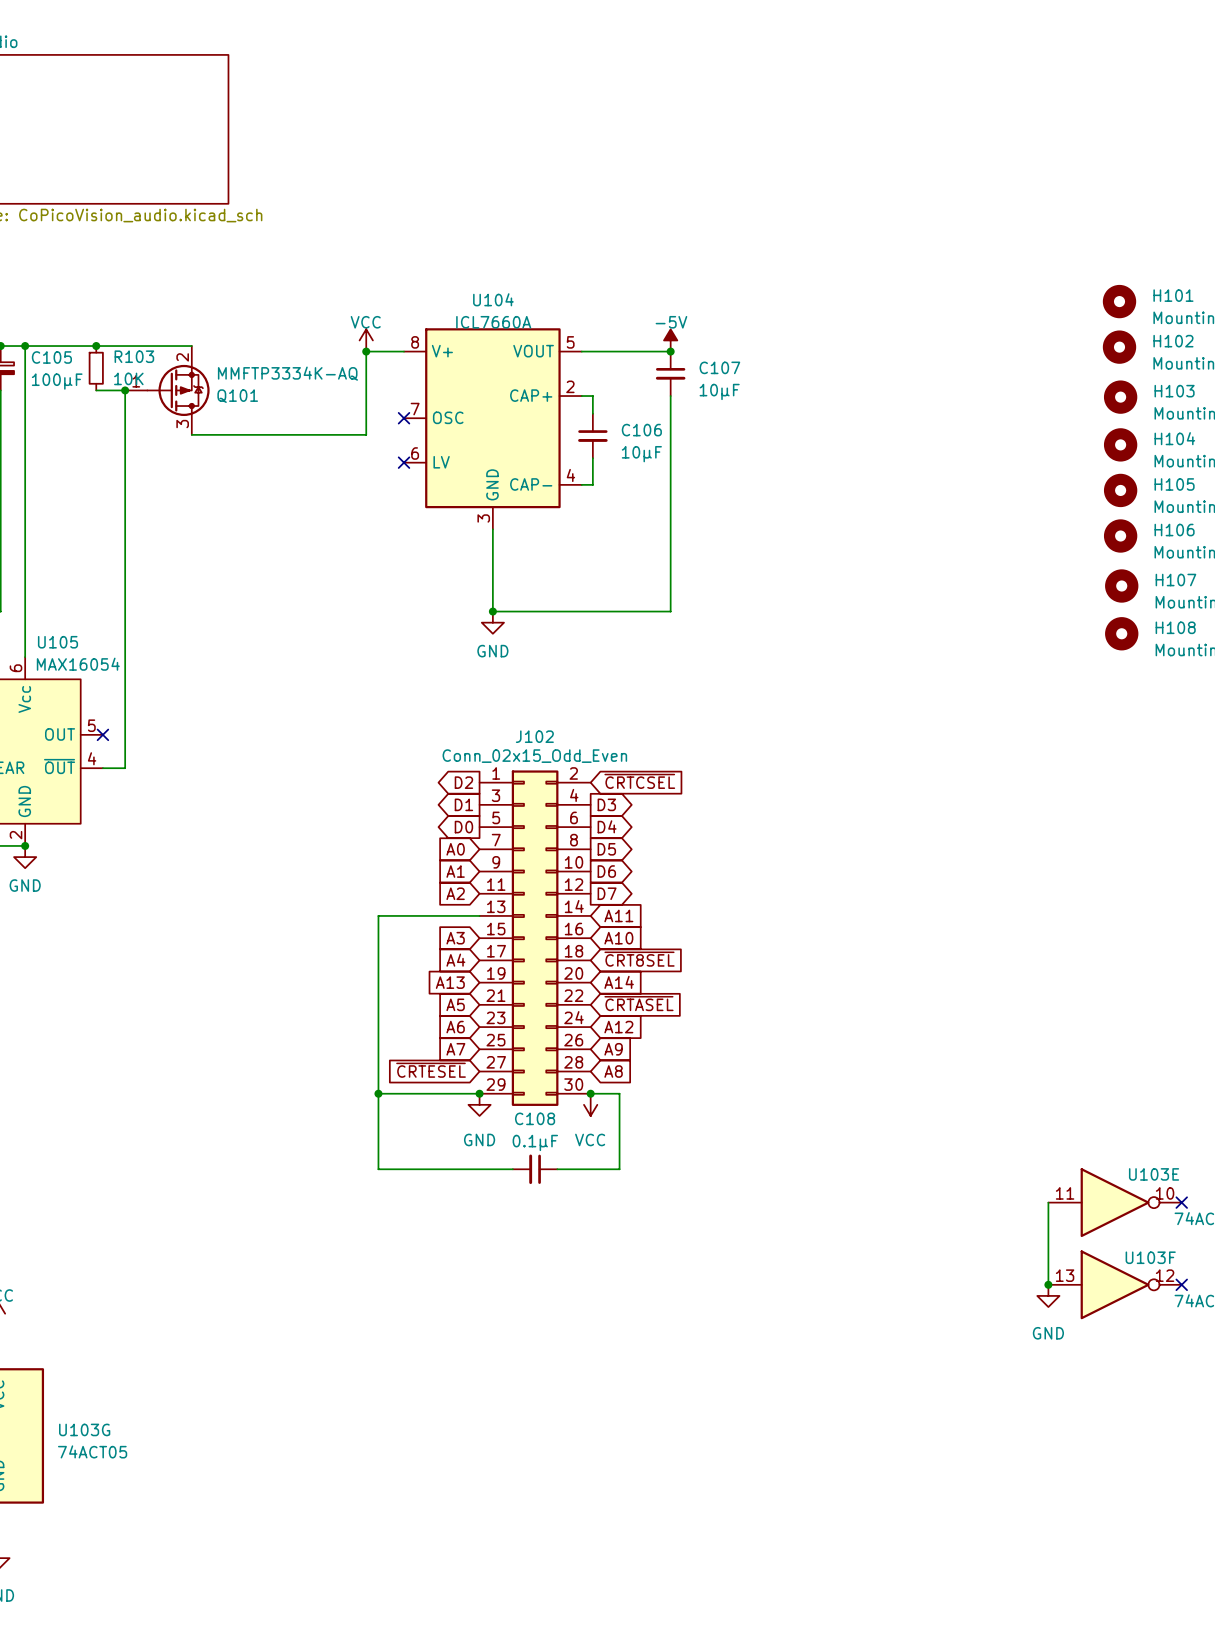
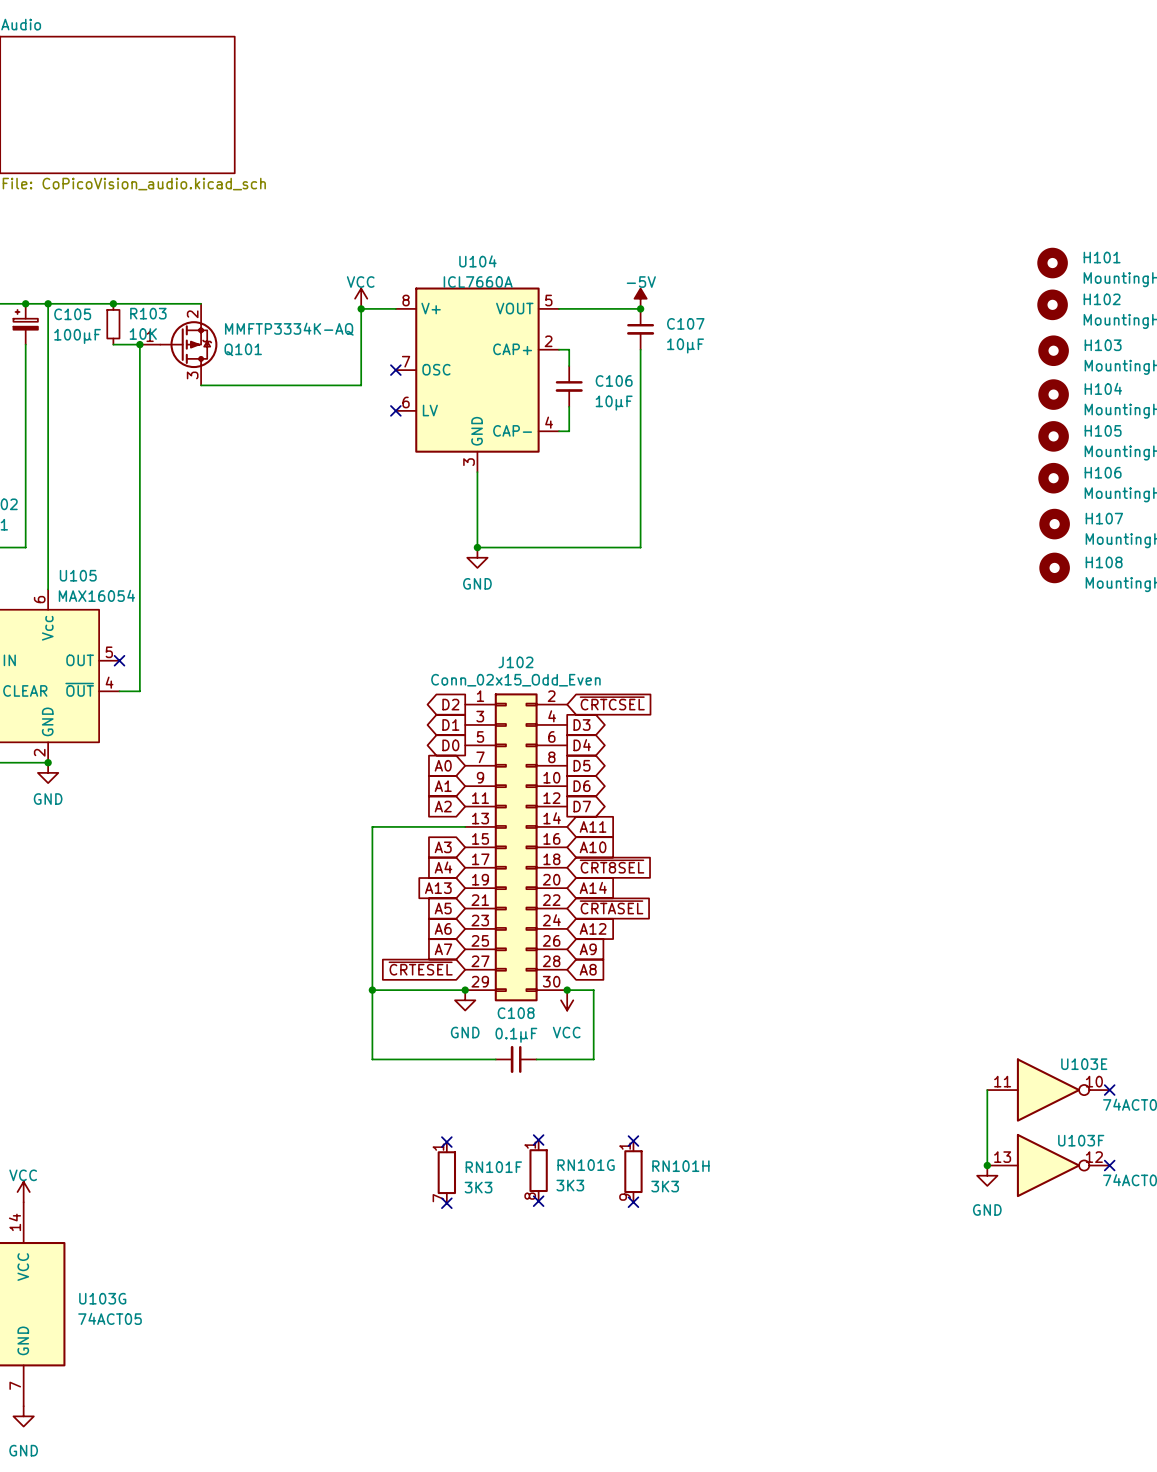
no-connect mark: none -> (538, 1140)
no-connect mark: none -> (633, 1141)
no-connect mark: none -> (446, 1142)
RN101G: none -> 3K3 (538, 1170)
RN101H: none -> 3K3 (633, 1171)
RN101F: none -> 3K3 (446, 1172)
no-connect mark: none -> (538, 1201)
no-connect mark: none -> (633, 1202)
no-connect mark: none -> (446, 1203)

